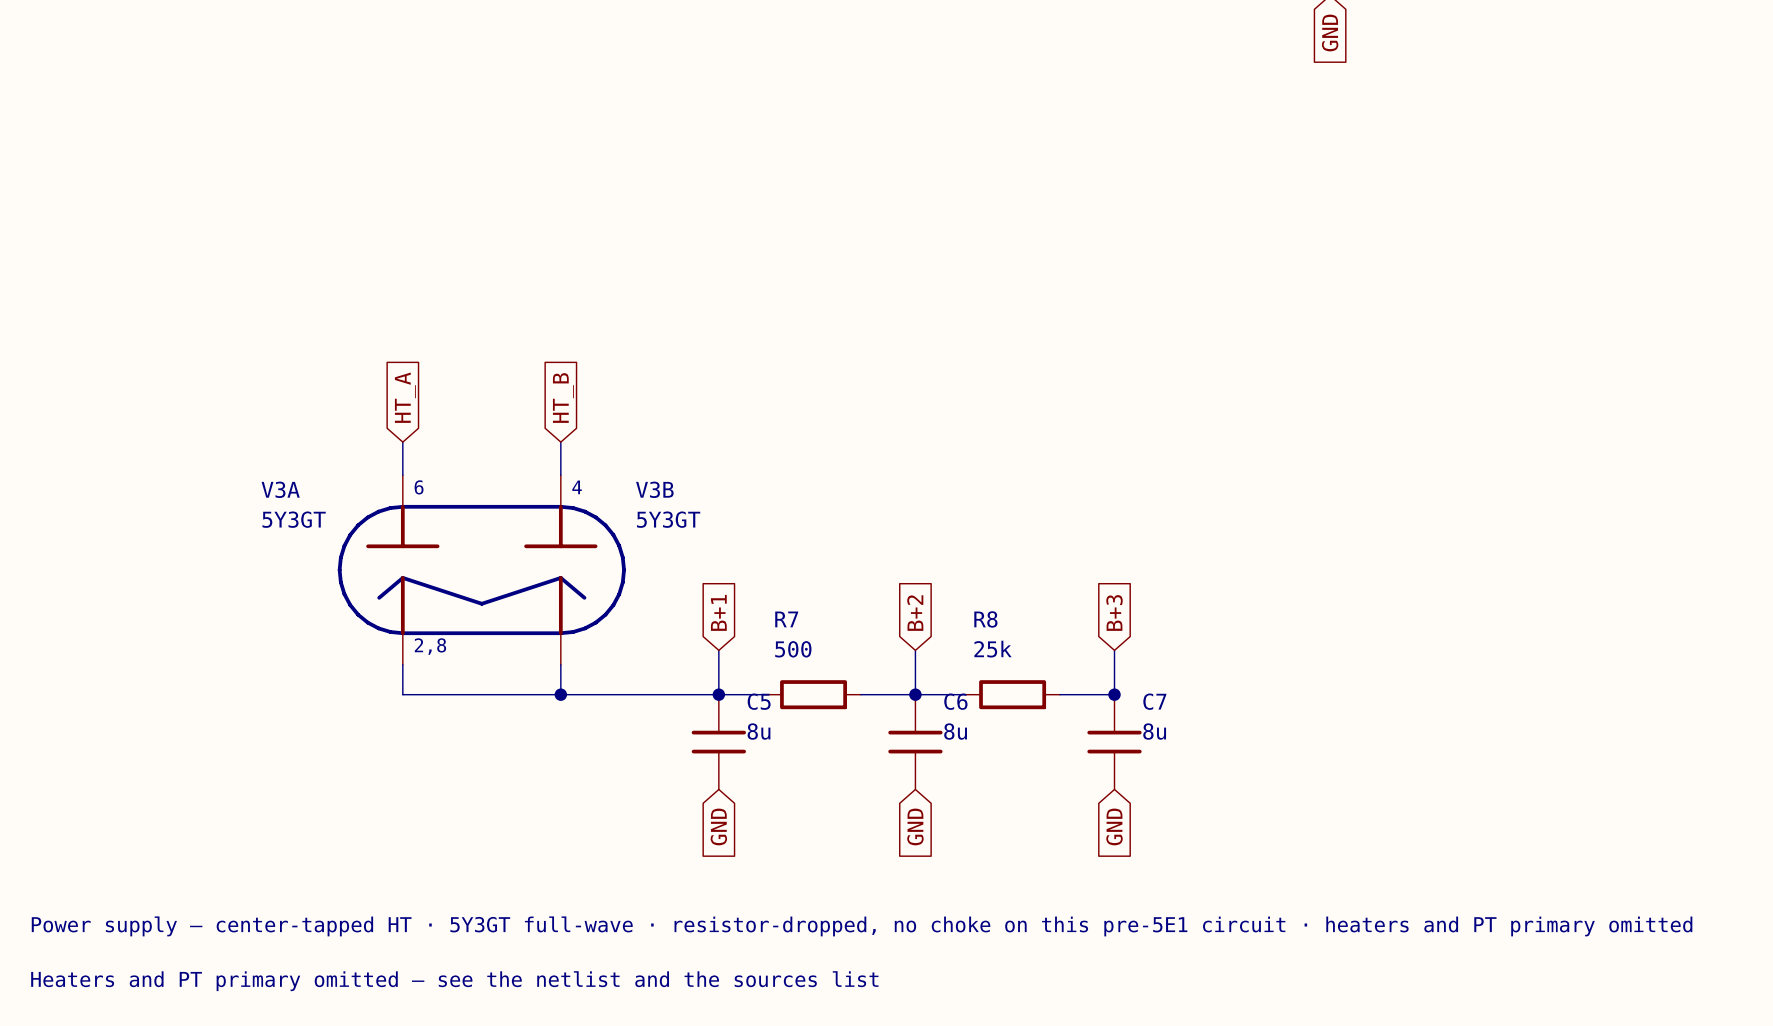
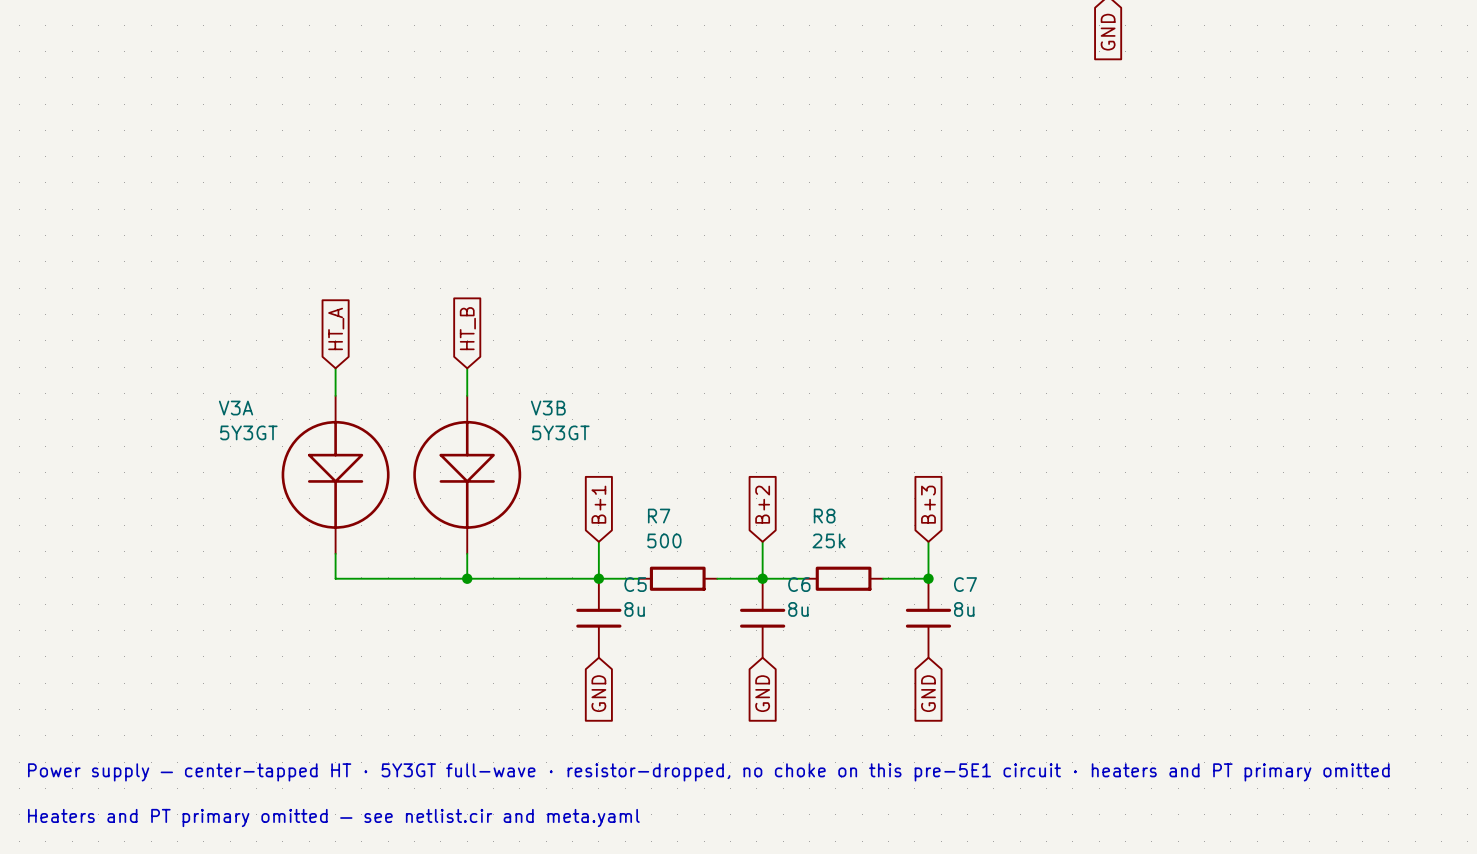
V3A symbol: [366, 475, 440, 665] -> [281, 395, 390, 554]
V3B symbol: [524, 475, 598, 665] -> [413, 395, 522, 554]
text: 6 (419, 487) -> none
text: 4 (577, 487) -> none
line: (402, 506) (378, 511) (367, 517) (350, 534) (340, 557) (340, 582) (350, 605) (367, 622) (378, 628) (402, 633) (573, 631) (595, 622) (613, 605) (619, 594) (624, 570) (619, 545) (605, 525) (585, 511) (560, 506) (402, 506) -> none
line: (379, 597) (402, 577) (481, 603) (560, 577) (584, 597) -> none
text: 2,8 (430, 646) -> none
text: Heaters and PT primary omitted — see the netlist and the sources list (454, 981) -> Heaters and PT primary omitted — see netlist.cir and meta.yaml (333, 817)

